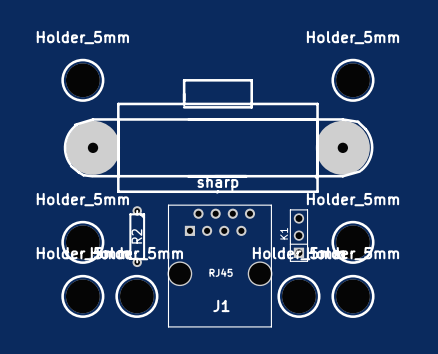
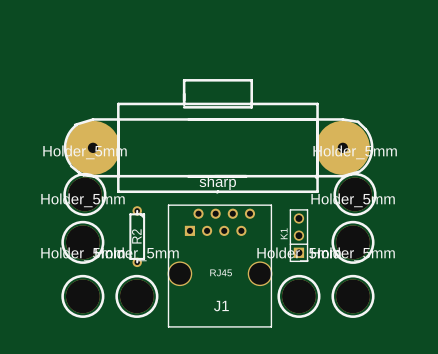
Holder_5mm position: (82, 80) -> (84, 194)
Holder_5mm position: (352, 80) -> (355, 194)

